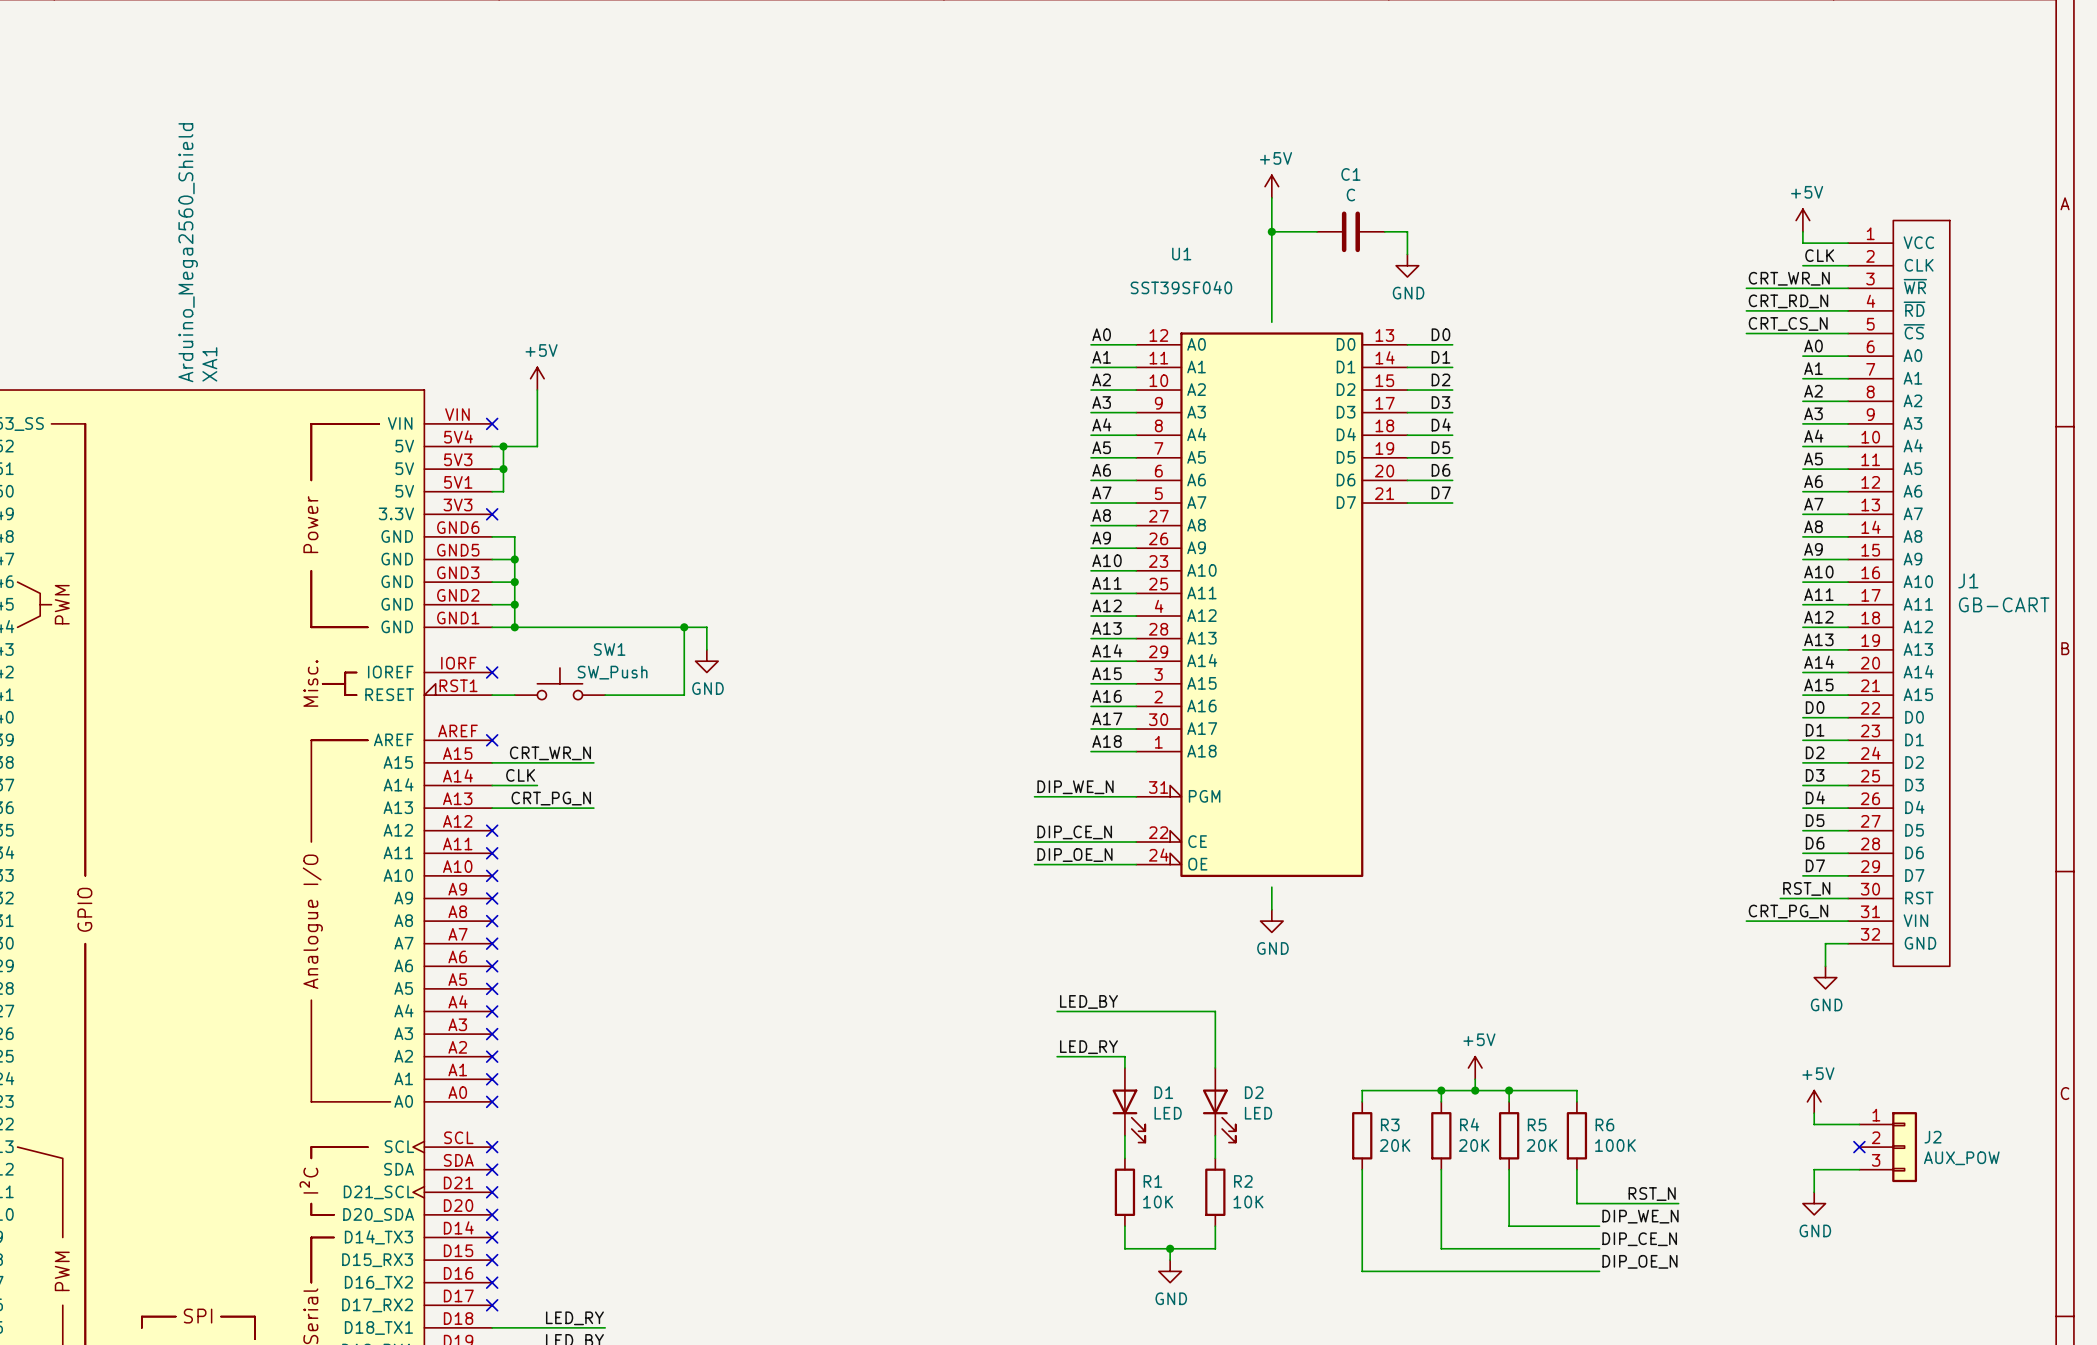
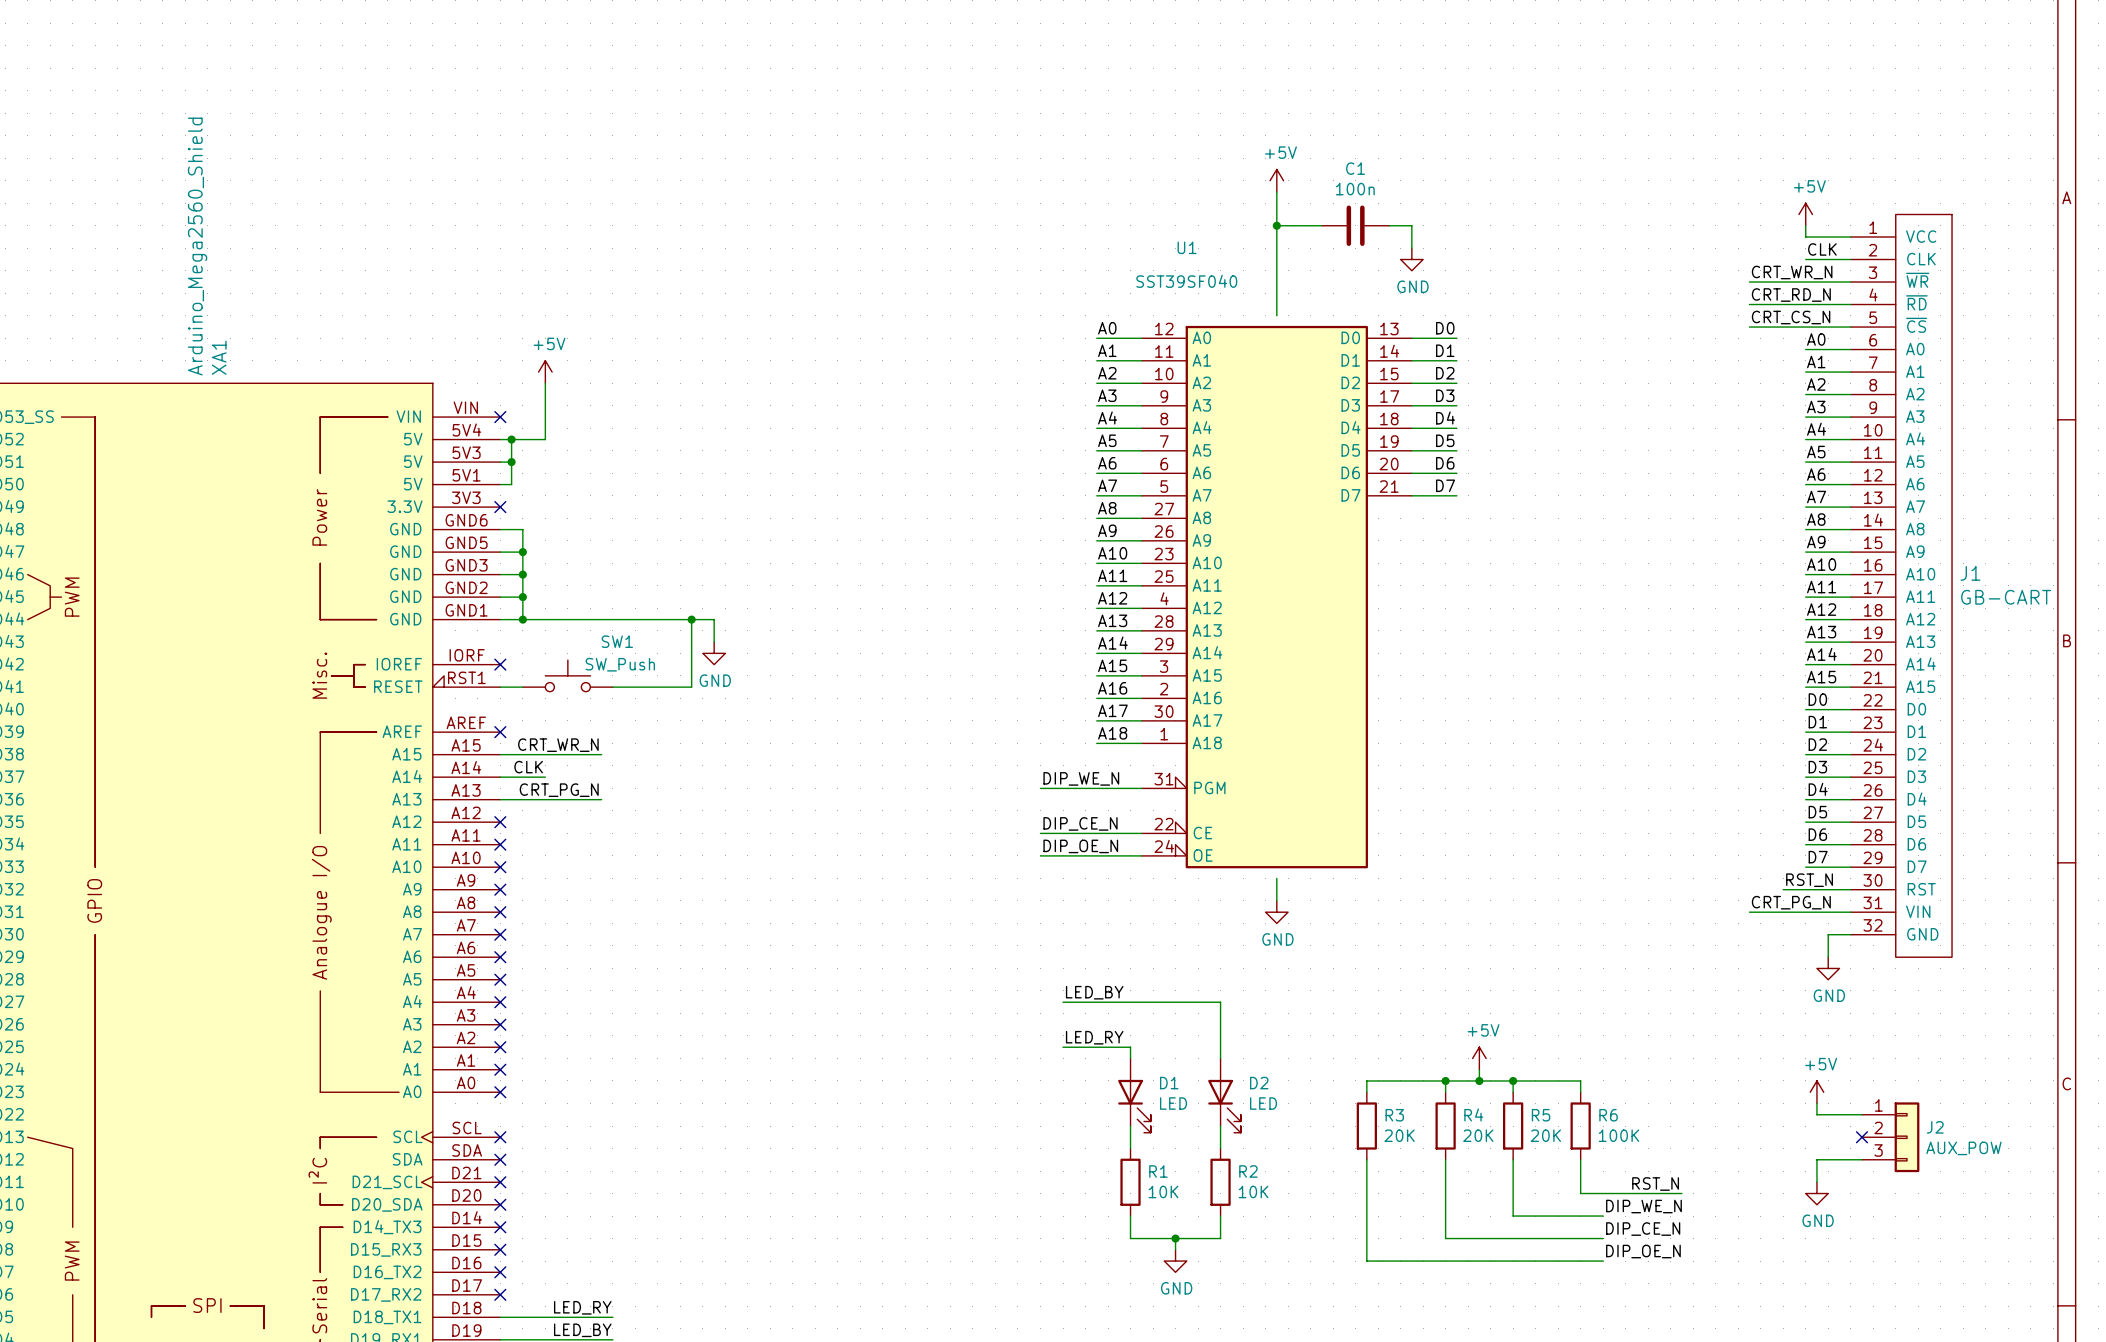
C1 value: C (1350, 195) -> 100n (1355, 189)

